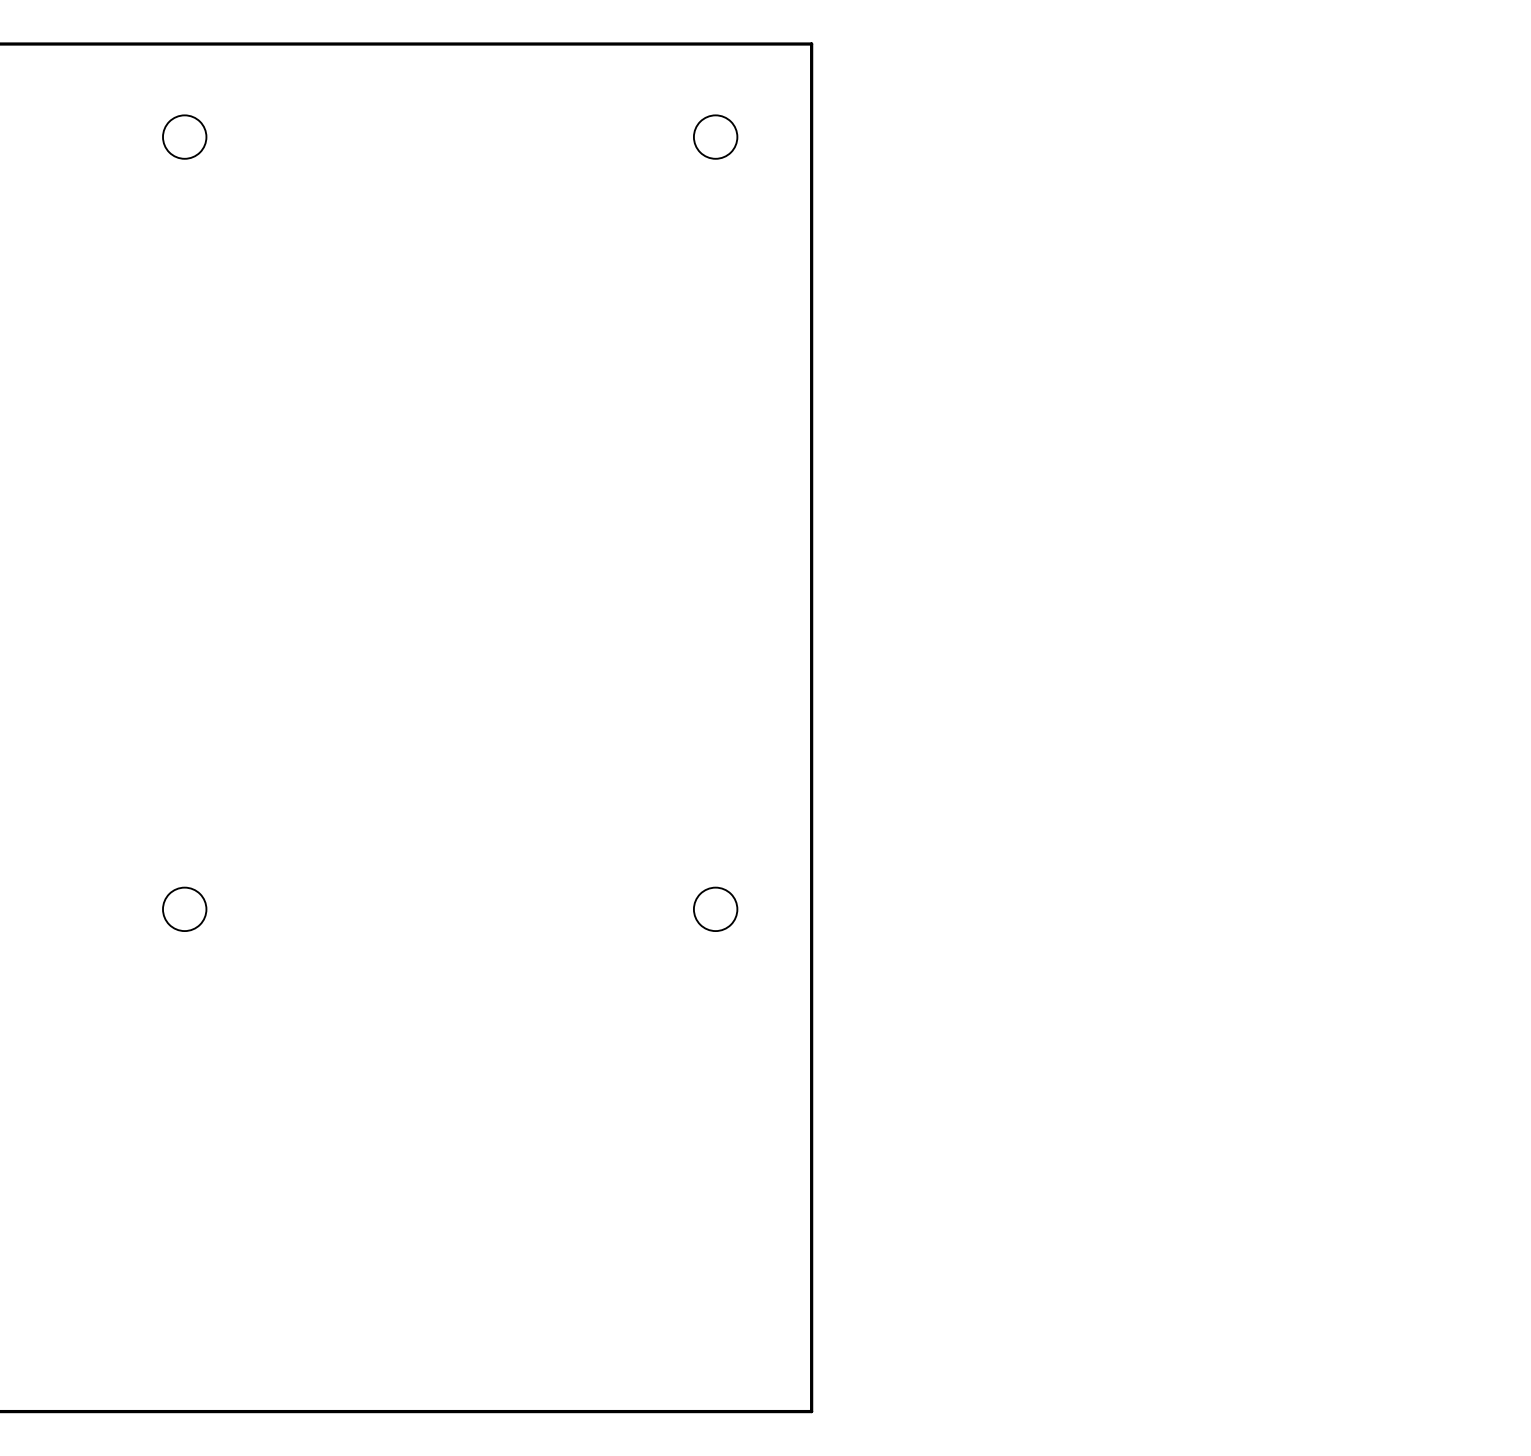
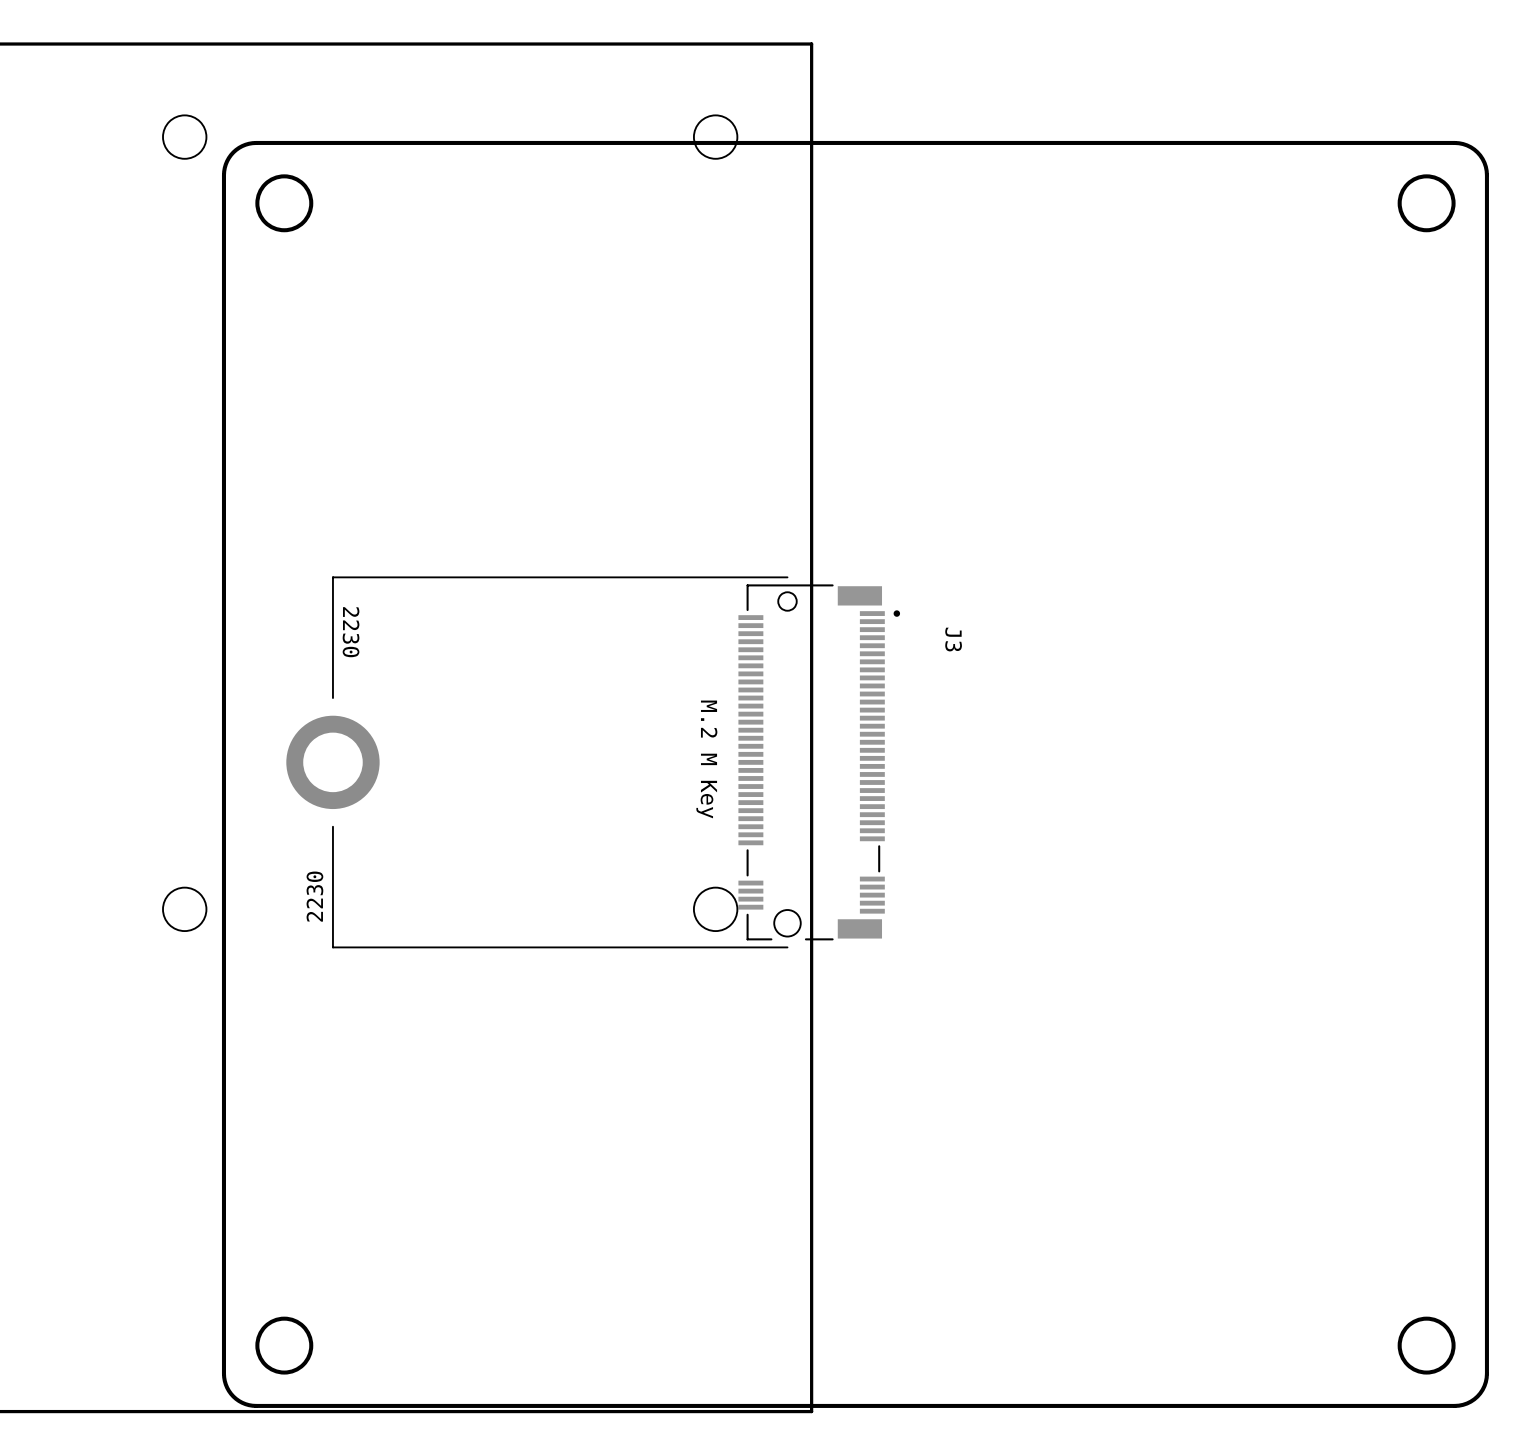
board edge: none -> (1454, 142) (256, 142) (245, 144) (233, 152) (227, 161) (223, 175) (223, 1373) (225, 1384) (233, 1396) (245, 1404) (256, 1405) (1454, 1405) (1467, 1403) (1477, 1396) (1484, 1386) (1486, 1373) (1486, 175) (1484, 162) (1477, 152) (1467, 145) (1454, 142)
round board edge: none -> [255, 174, 314, 233]
round board edge: none -> [1397, 174, 1456, 233]
J3: none -> (593, 762)
round board edge: none -> [255, 1316, 314, 1375]
round board edge: none -> [1397, 1316, 1456, 1375]

